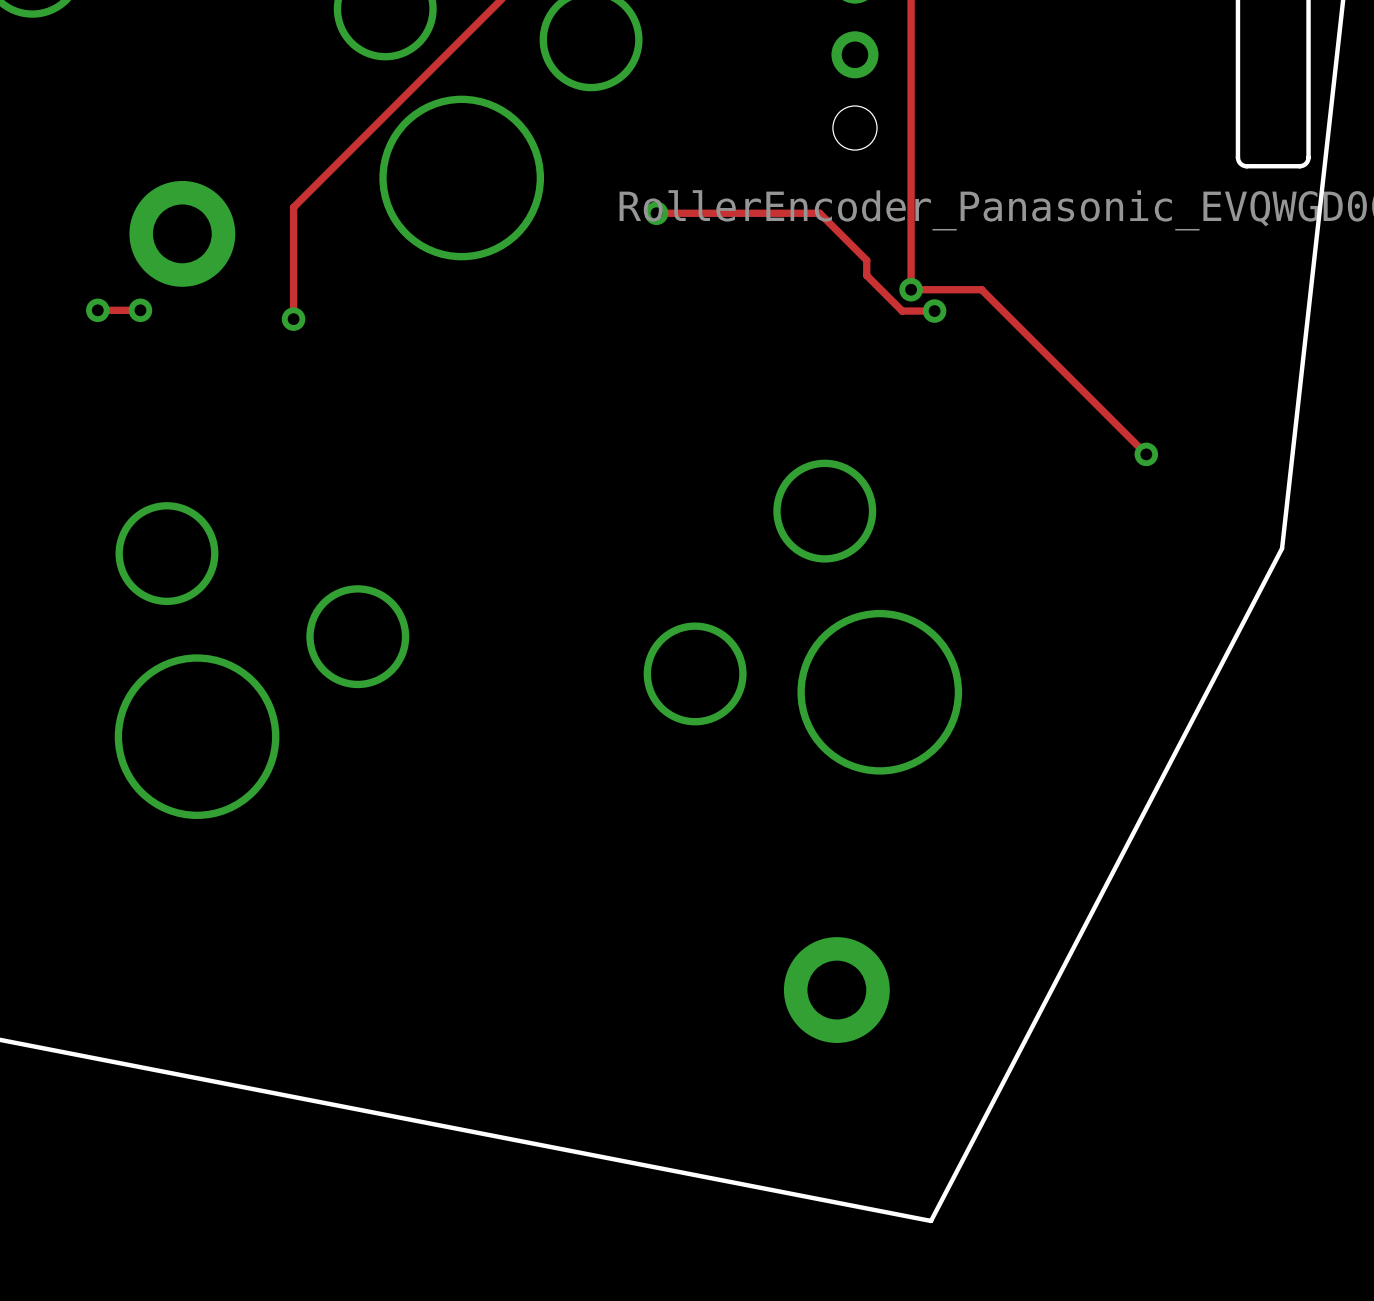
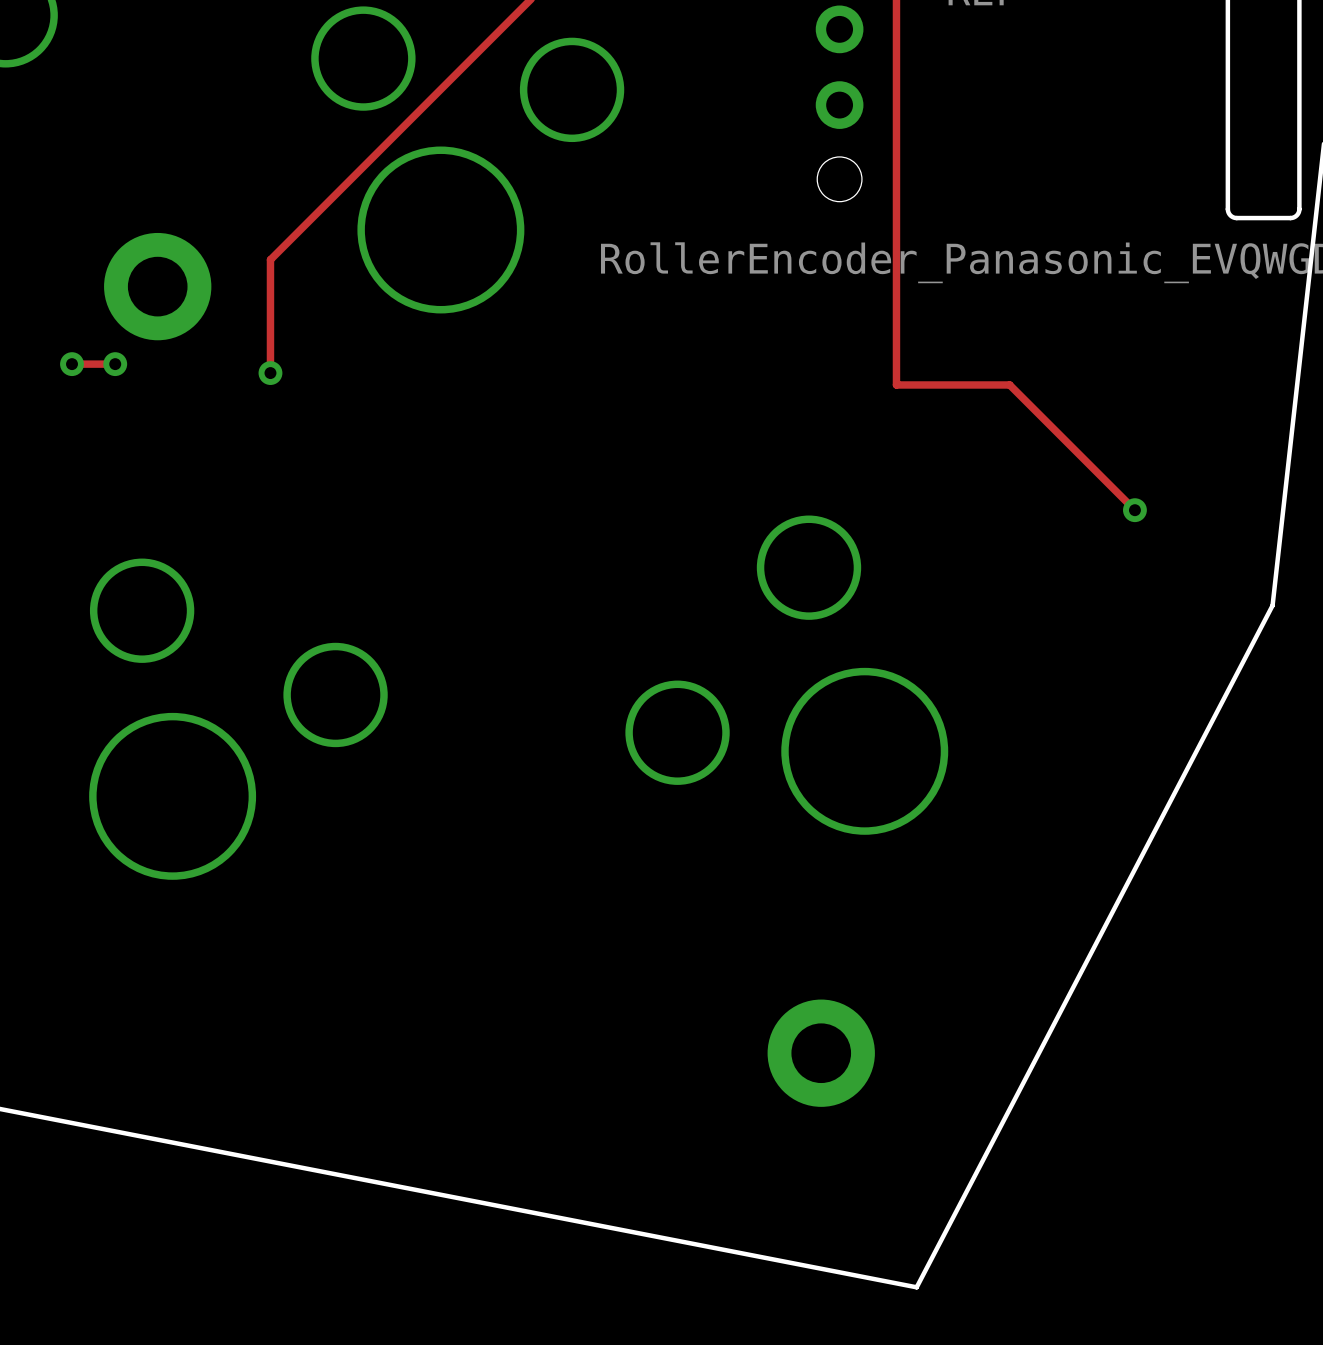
track: (656, 213) (819, 213) (866, 260) (866, 275) (902, 311) (934, 311) -> none
via: (656, 213) -> none
track: (911, 289) (981, 289) (1022, 330) -> (896, 343) (896, 384) (1009, 384)
via: (911, 289) -> none
via: (934, 311) -> none

